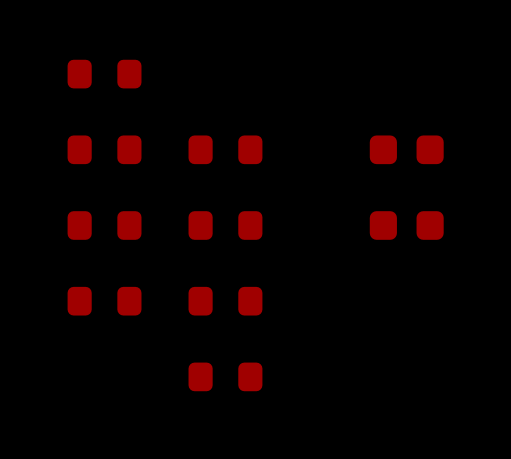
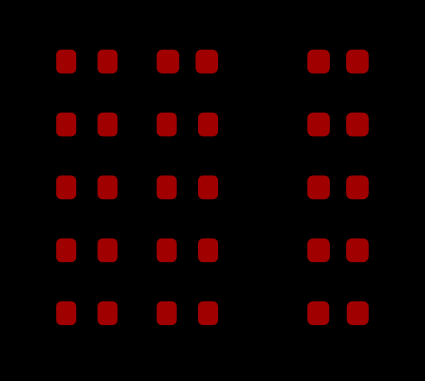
part: none -> (187, 61)
part: none -> (337, 61)
part: none -> (337, 250)
part: none -> (86, 313)
part: none -> (337, 313)

